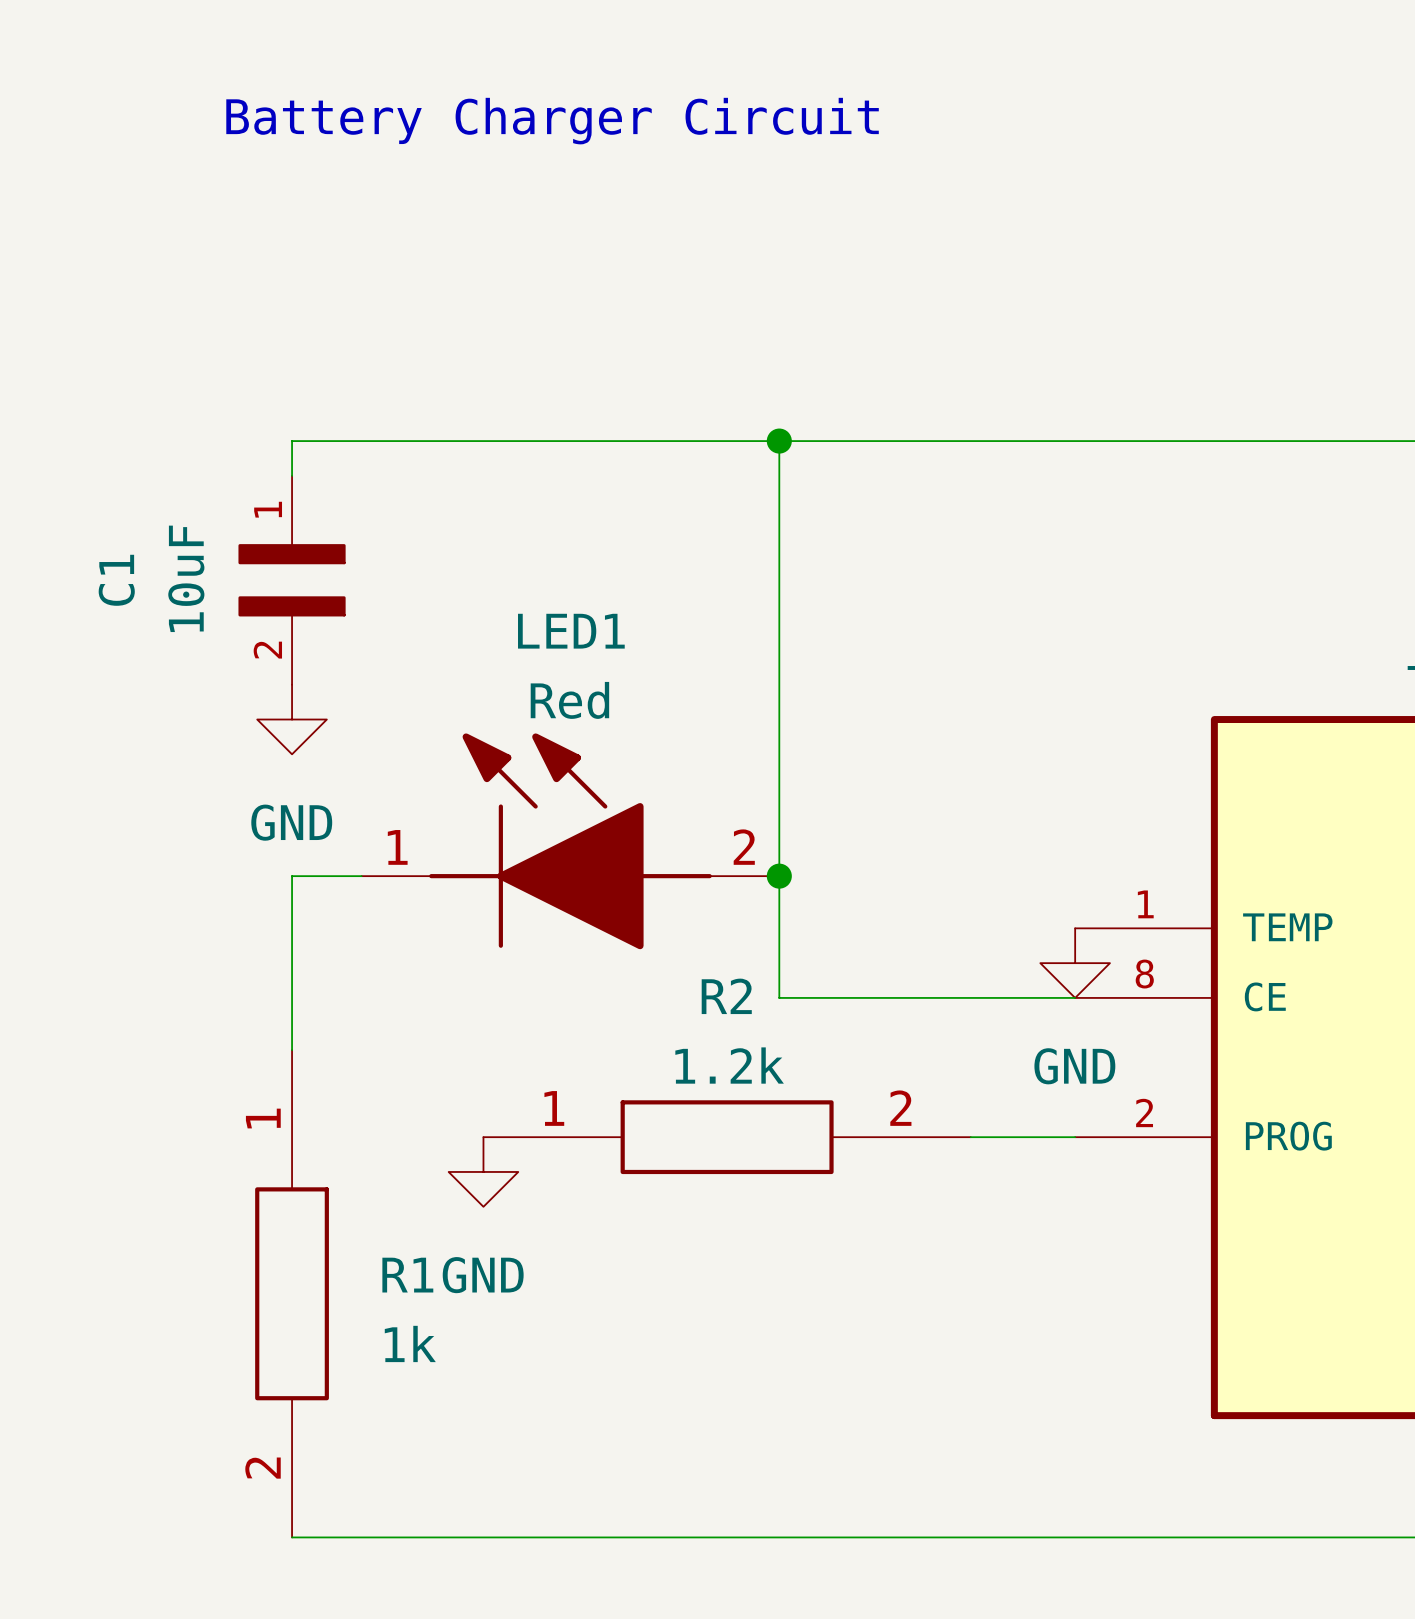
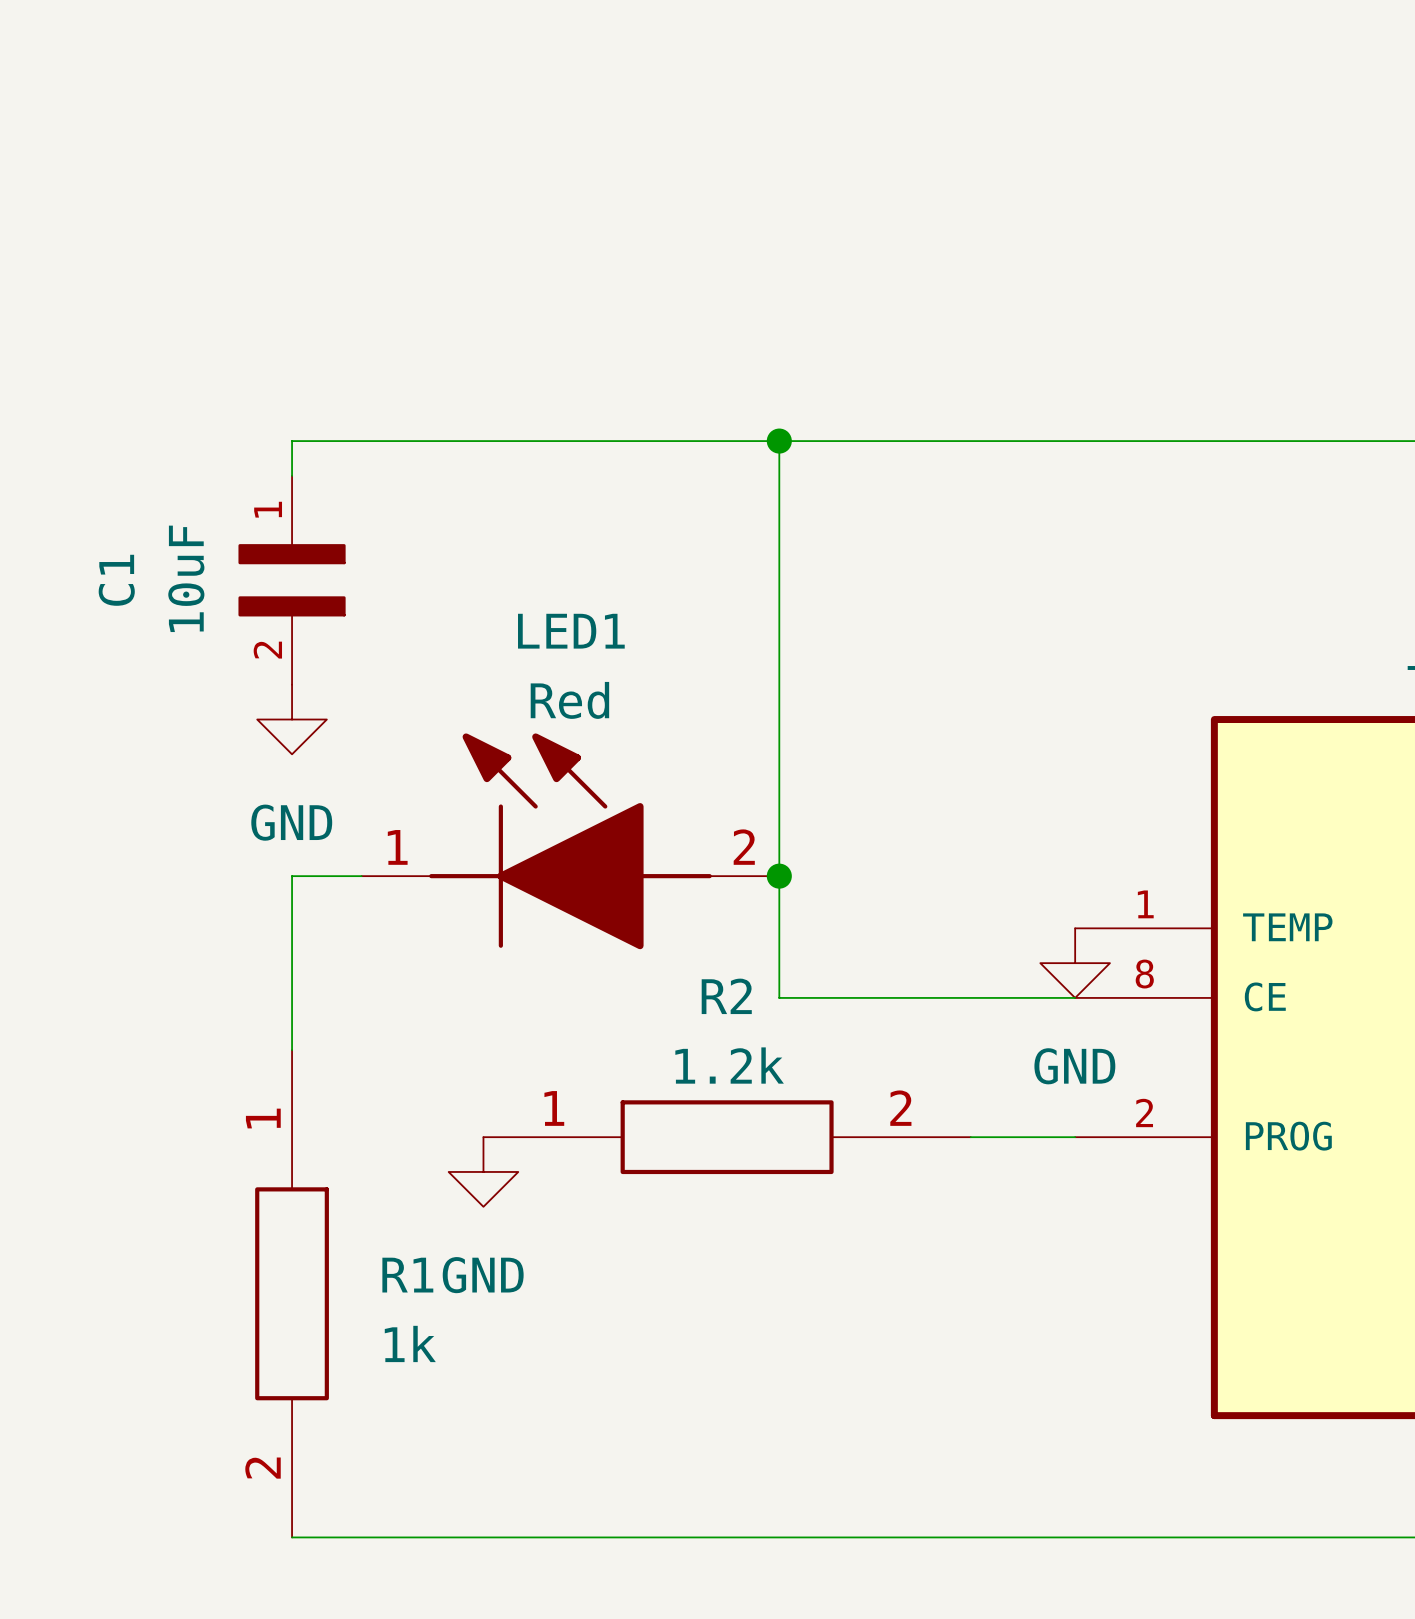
text: Battery Charger Circuit (552, 121) -> none

